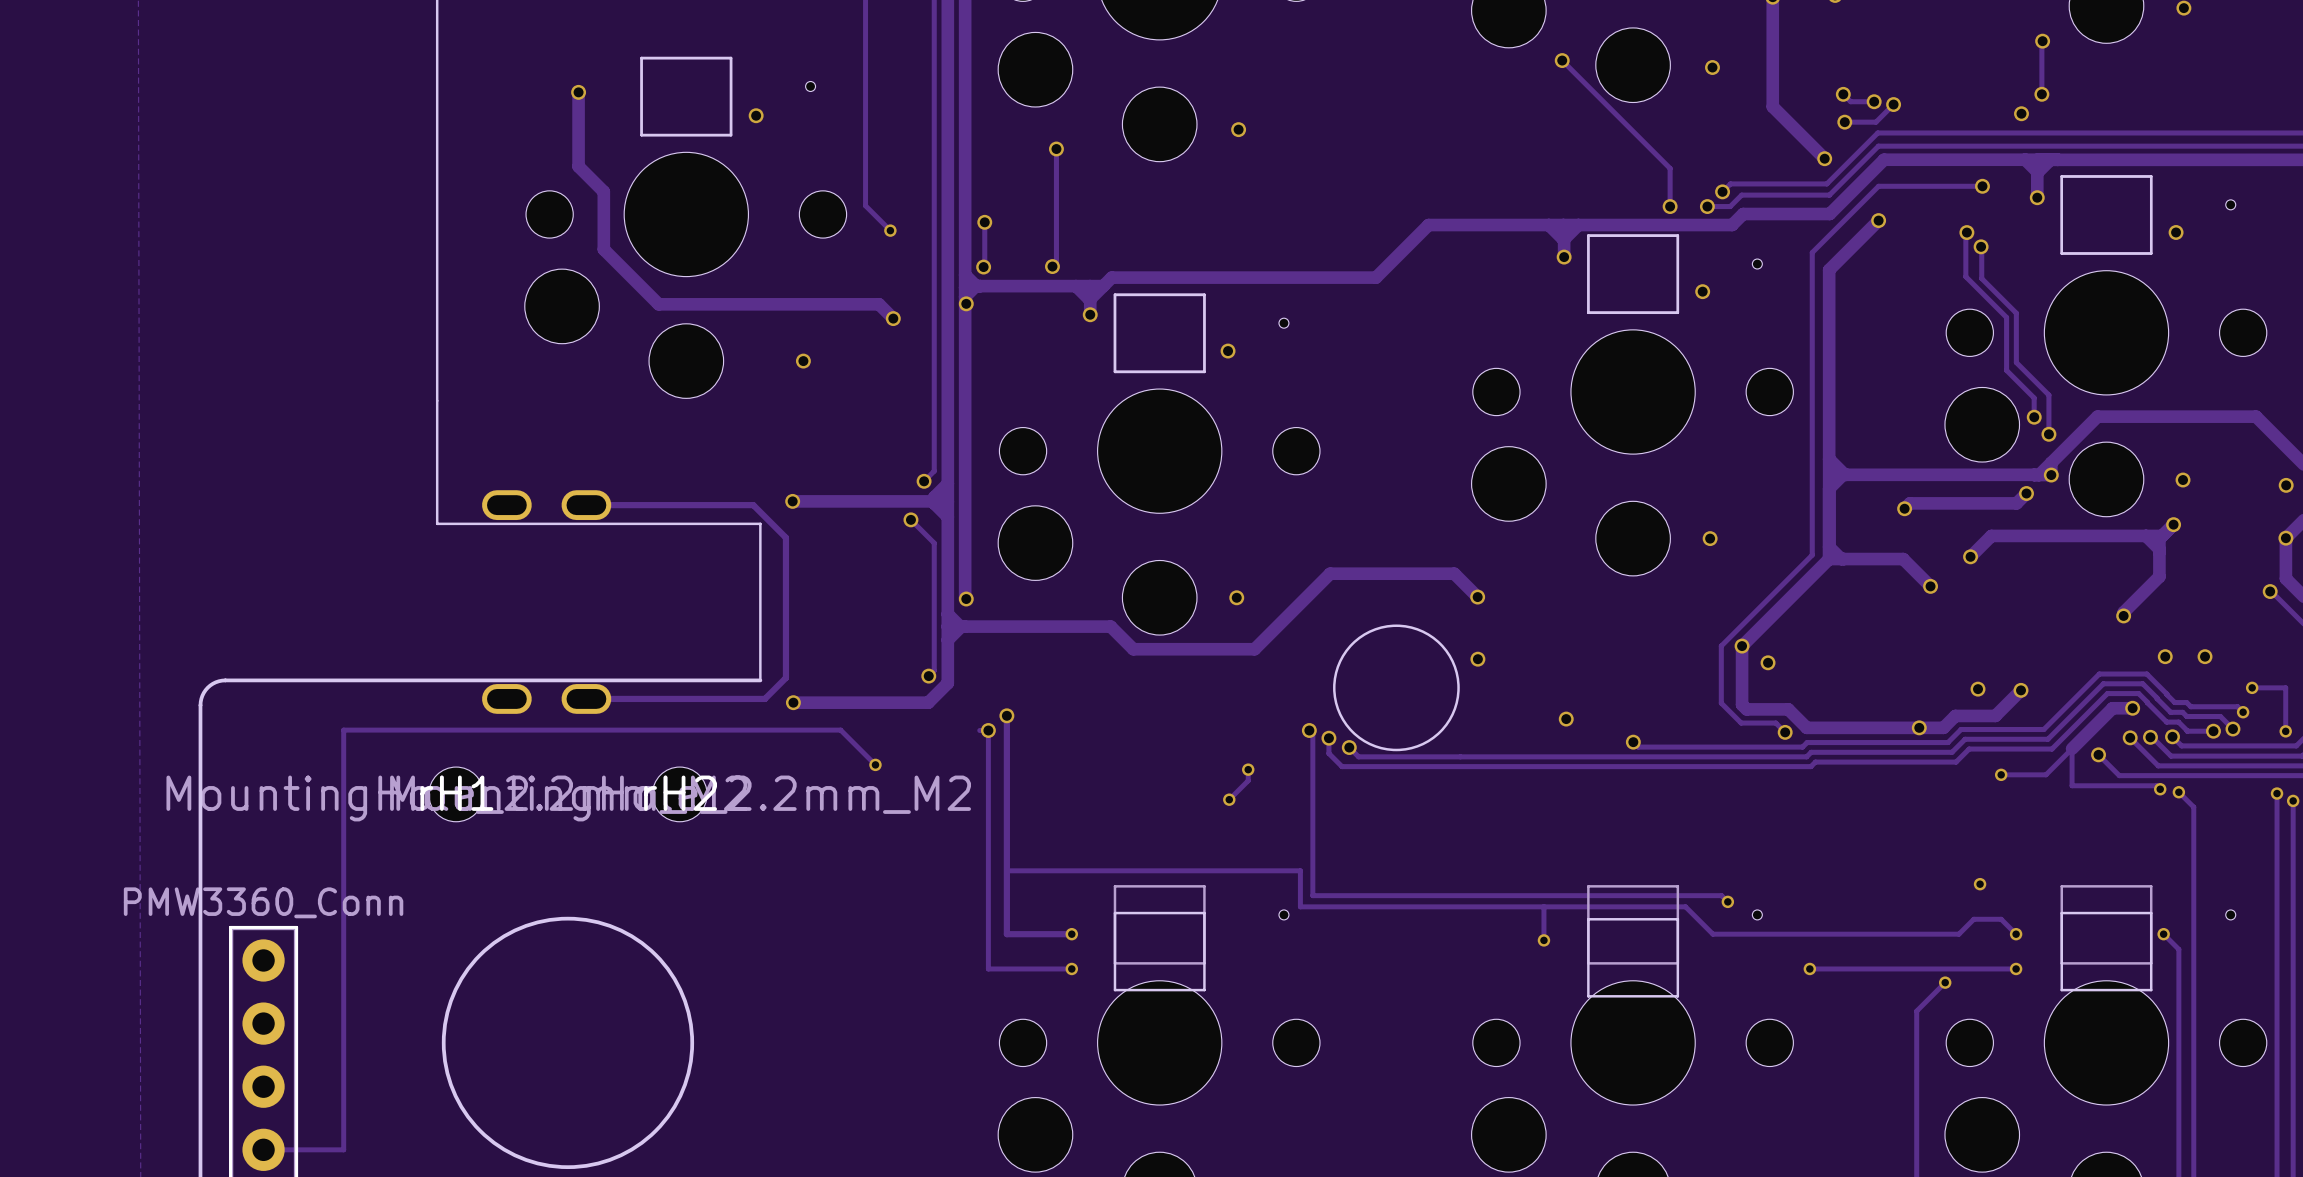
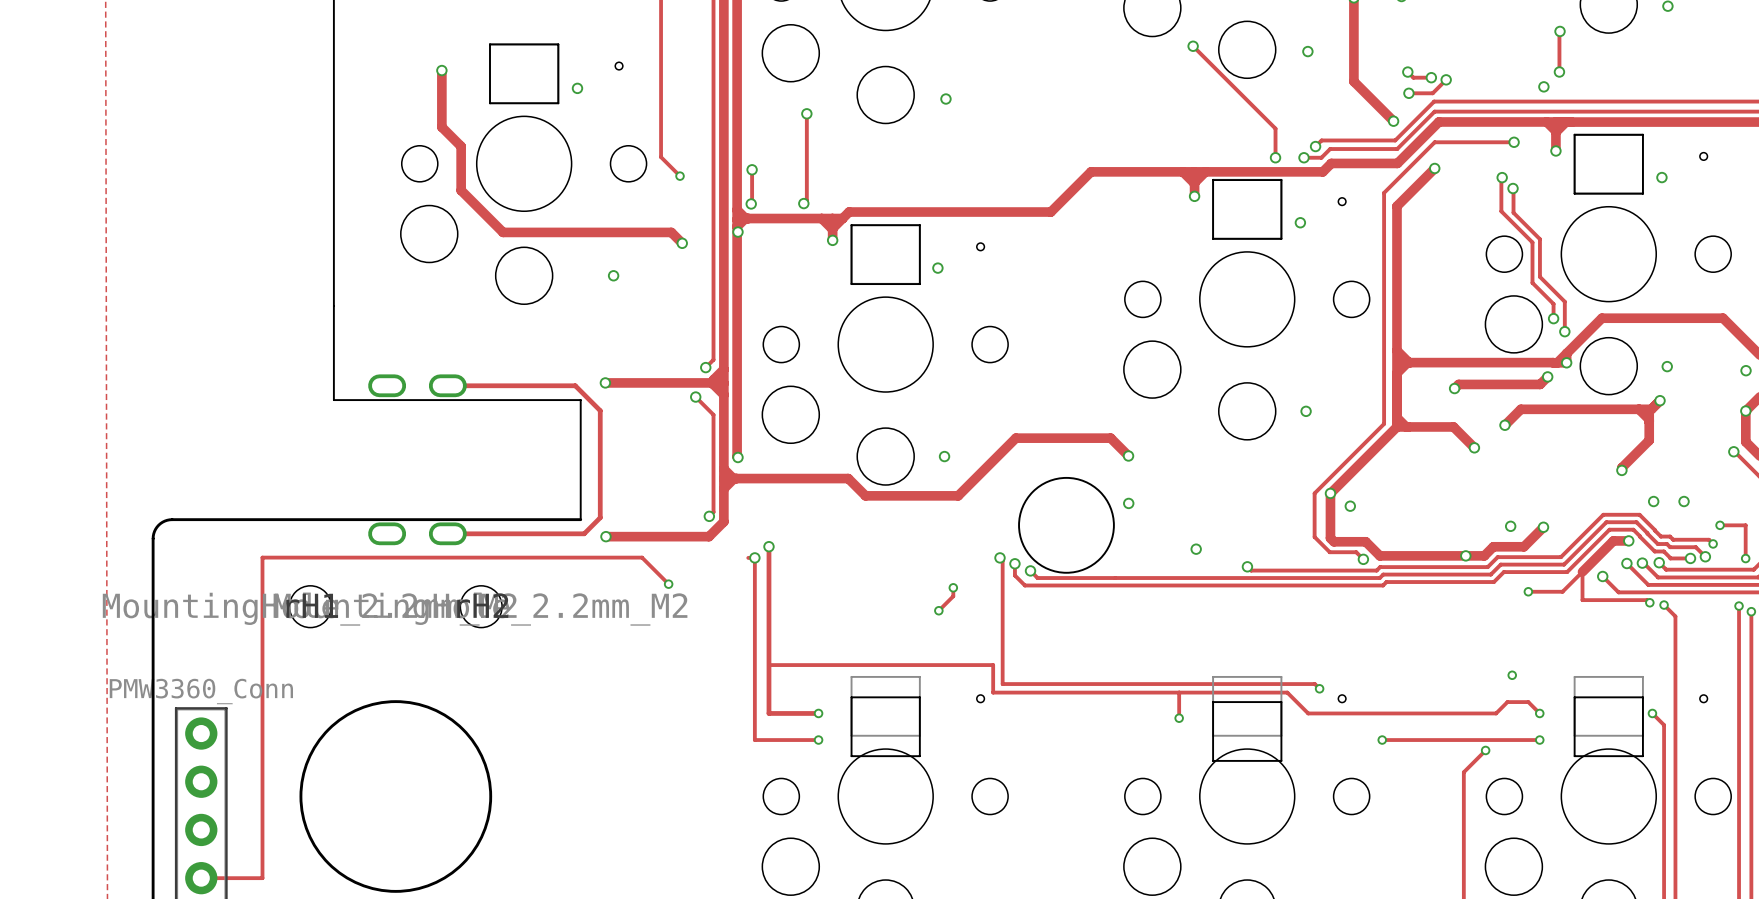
rH1 position: (456, 794) -> (310, 606)
rH2 position: (679, 794) -> (481, 606)
round board edge position: (567, 1042) -> (395, 796)

